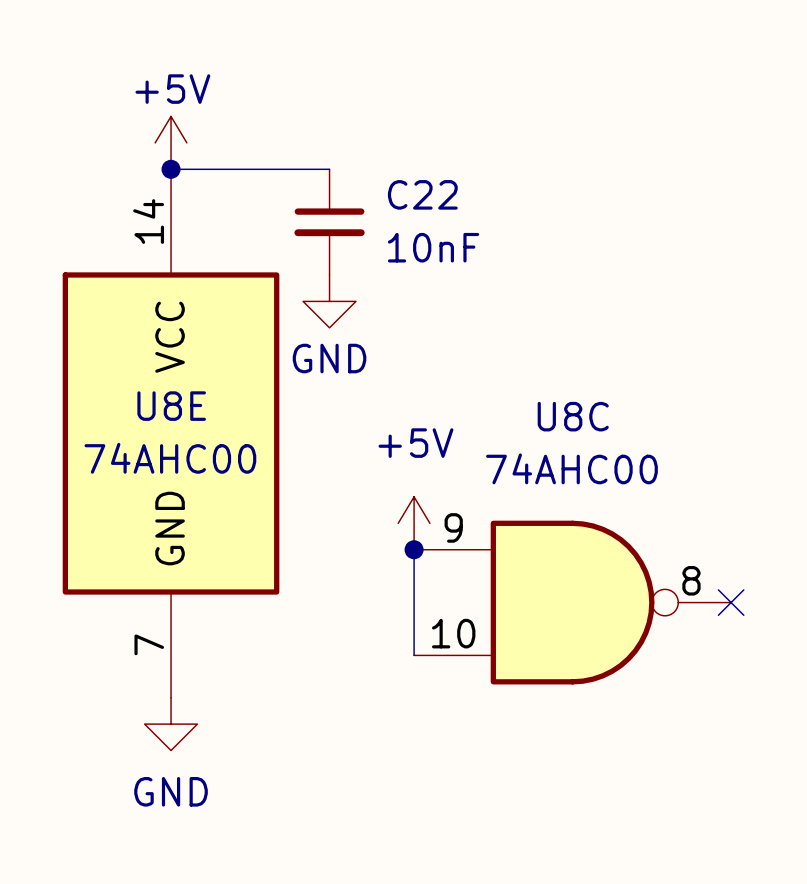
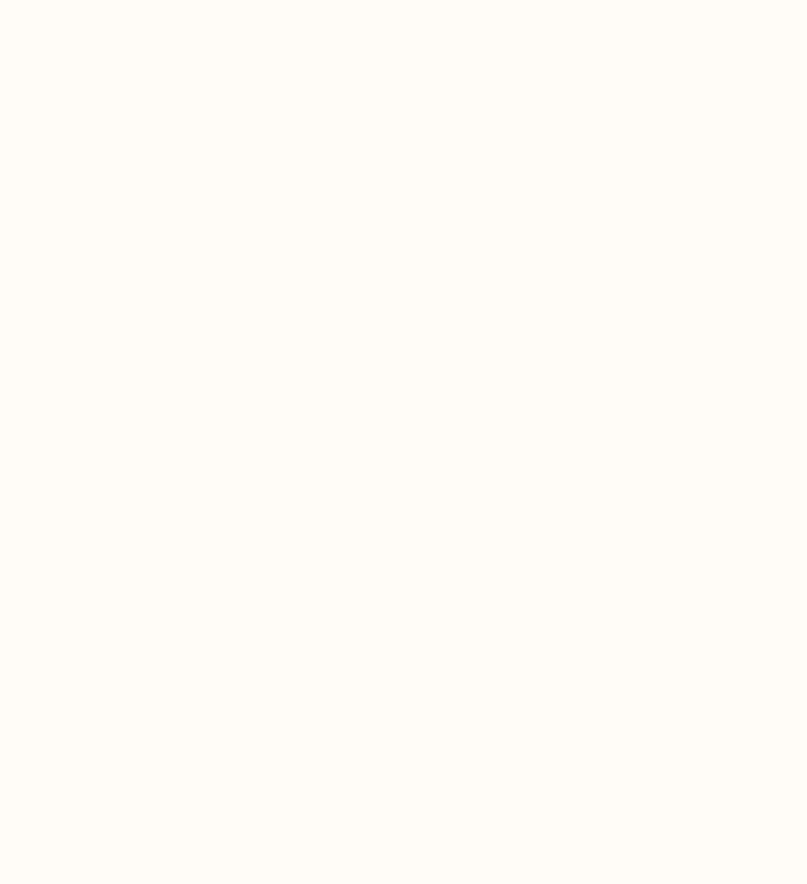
power symbol: +5V (171, 142) -> none
wire: (171, 169) (329, 169) -> none
junction: (171, 169) -> none
C22: 10nF (329, 222) -> none
power symbol: GND (329, 301) -> none
U8E: 74AHC00 (171, 433) -> none
power symbol: +5V (414, 523) -> none
wire: (414, 549) (414, 655) -> none
junction: (414, 549) -> none
U8C: 74AHC00 (572, 602) -> none
no-connect mark: (731, 602) -> none
power symbol: GND (171, 724) -> none

